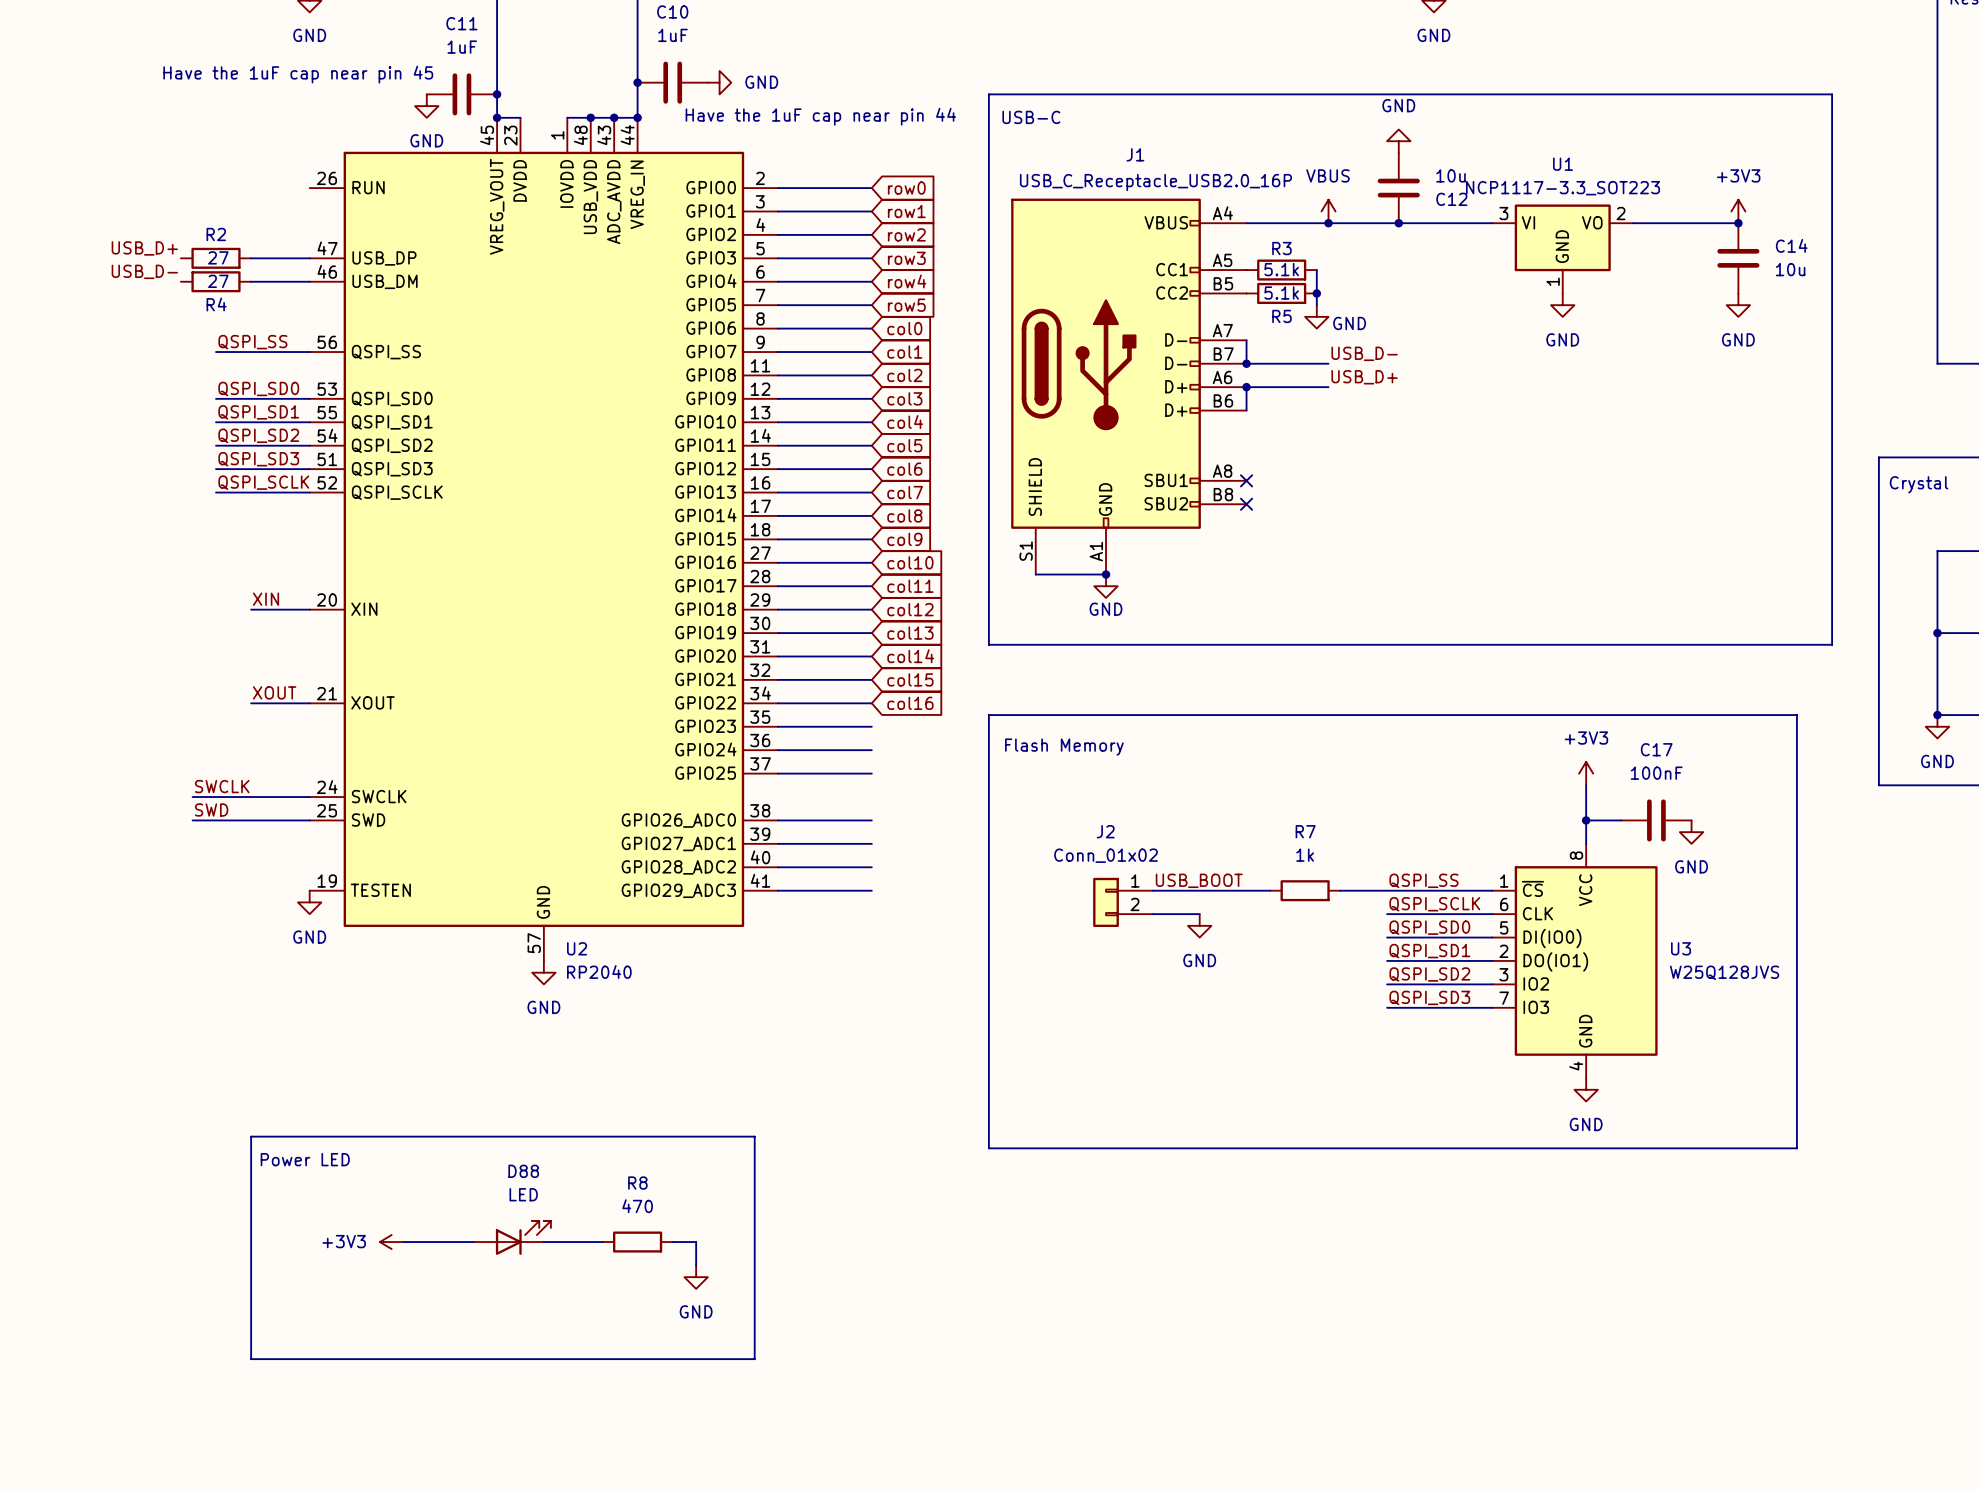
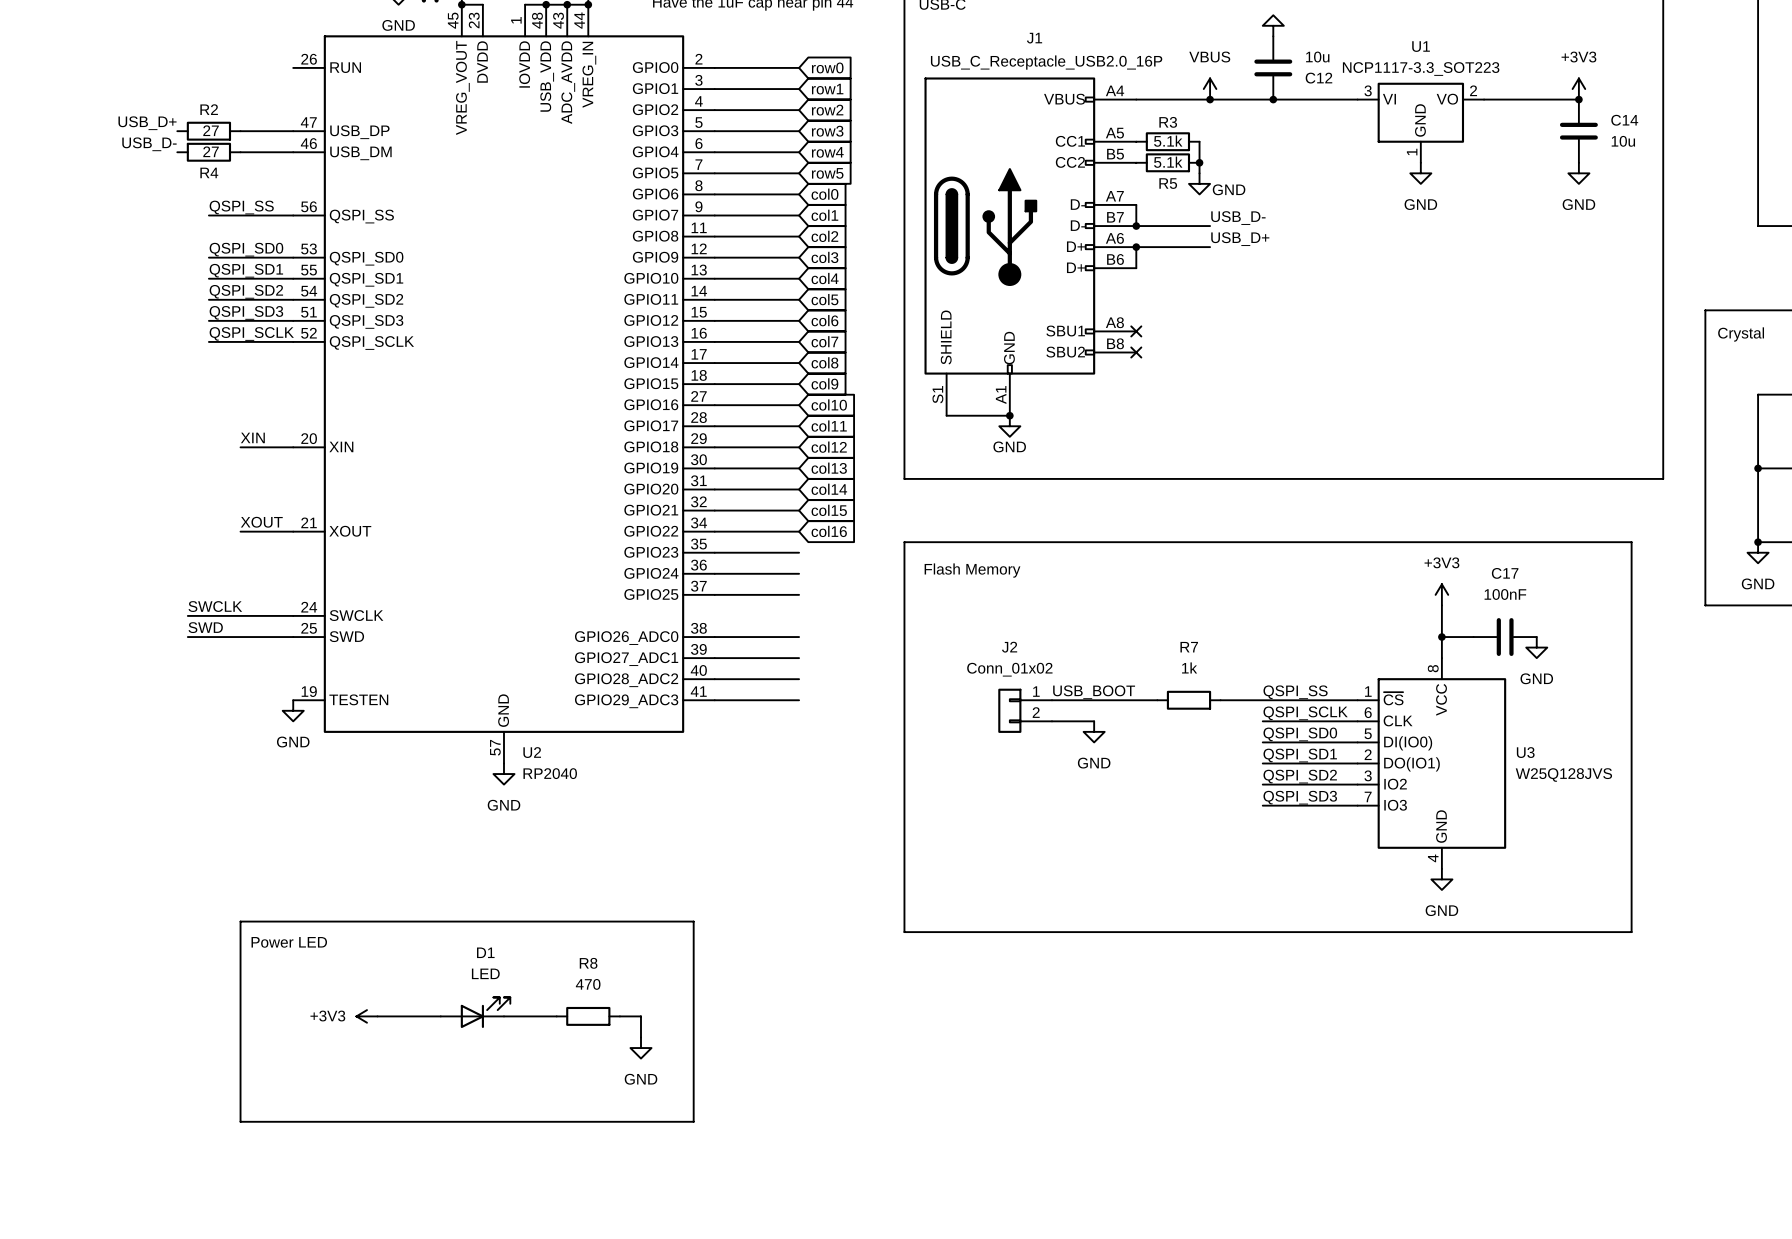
D88 name: D88 (523, 1171) -> D1 (485, 952)

